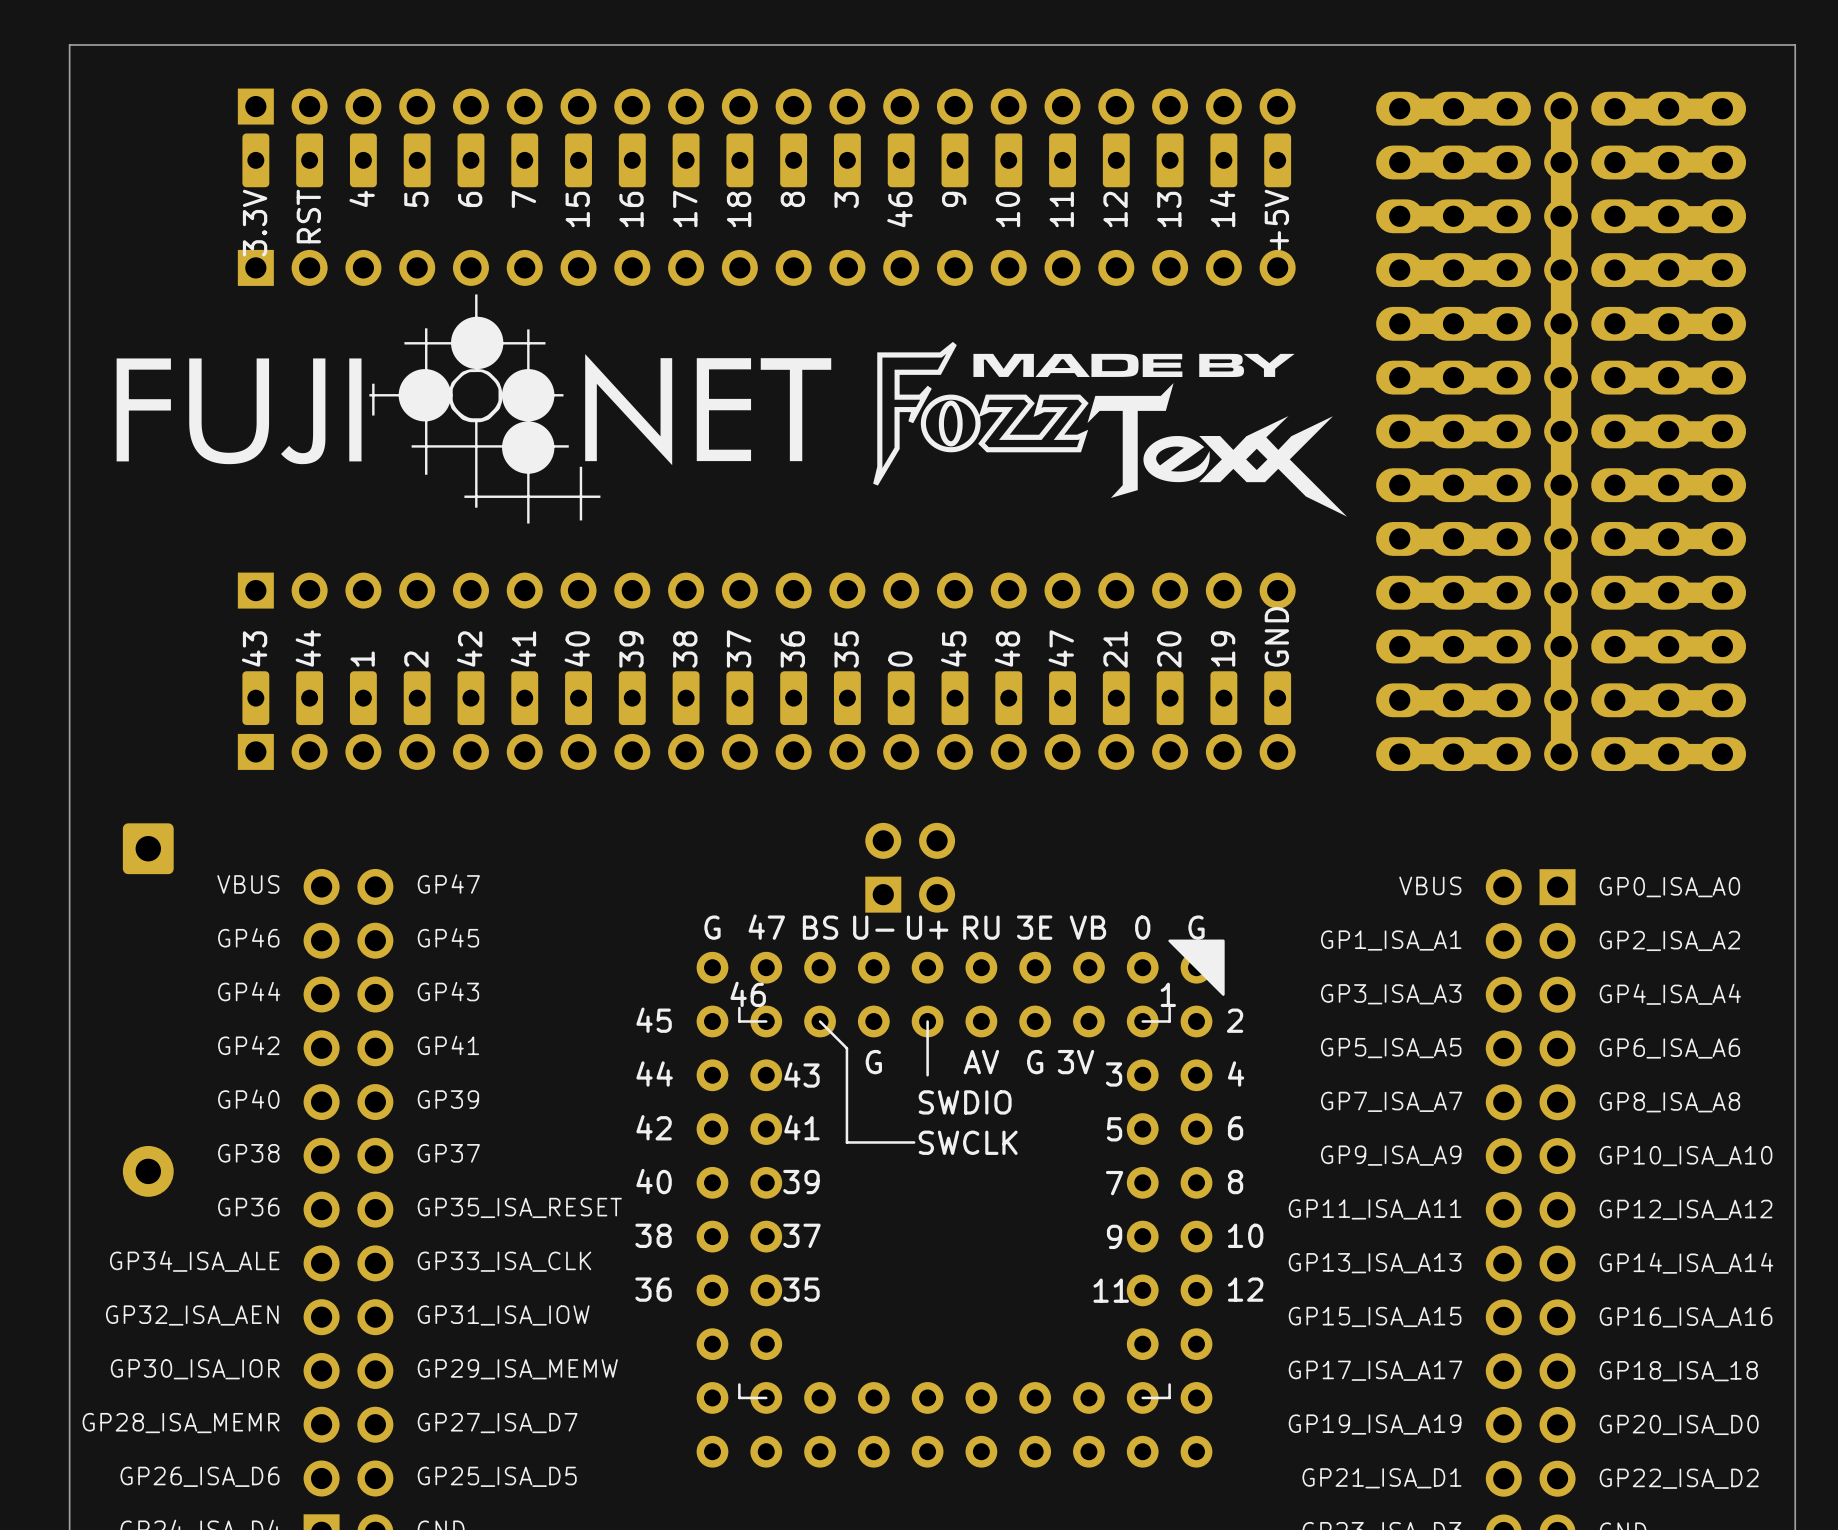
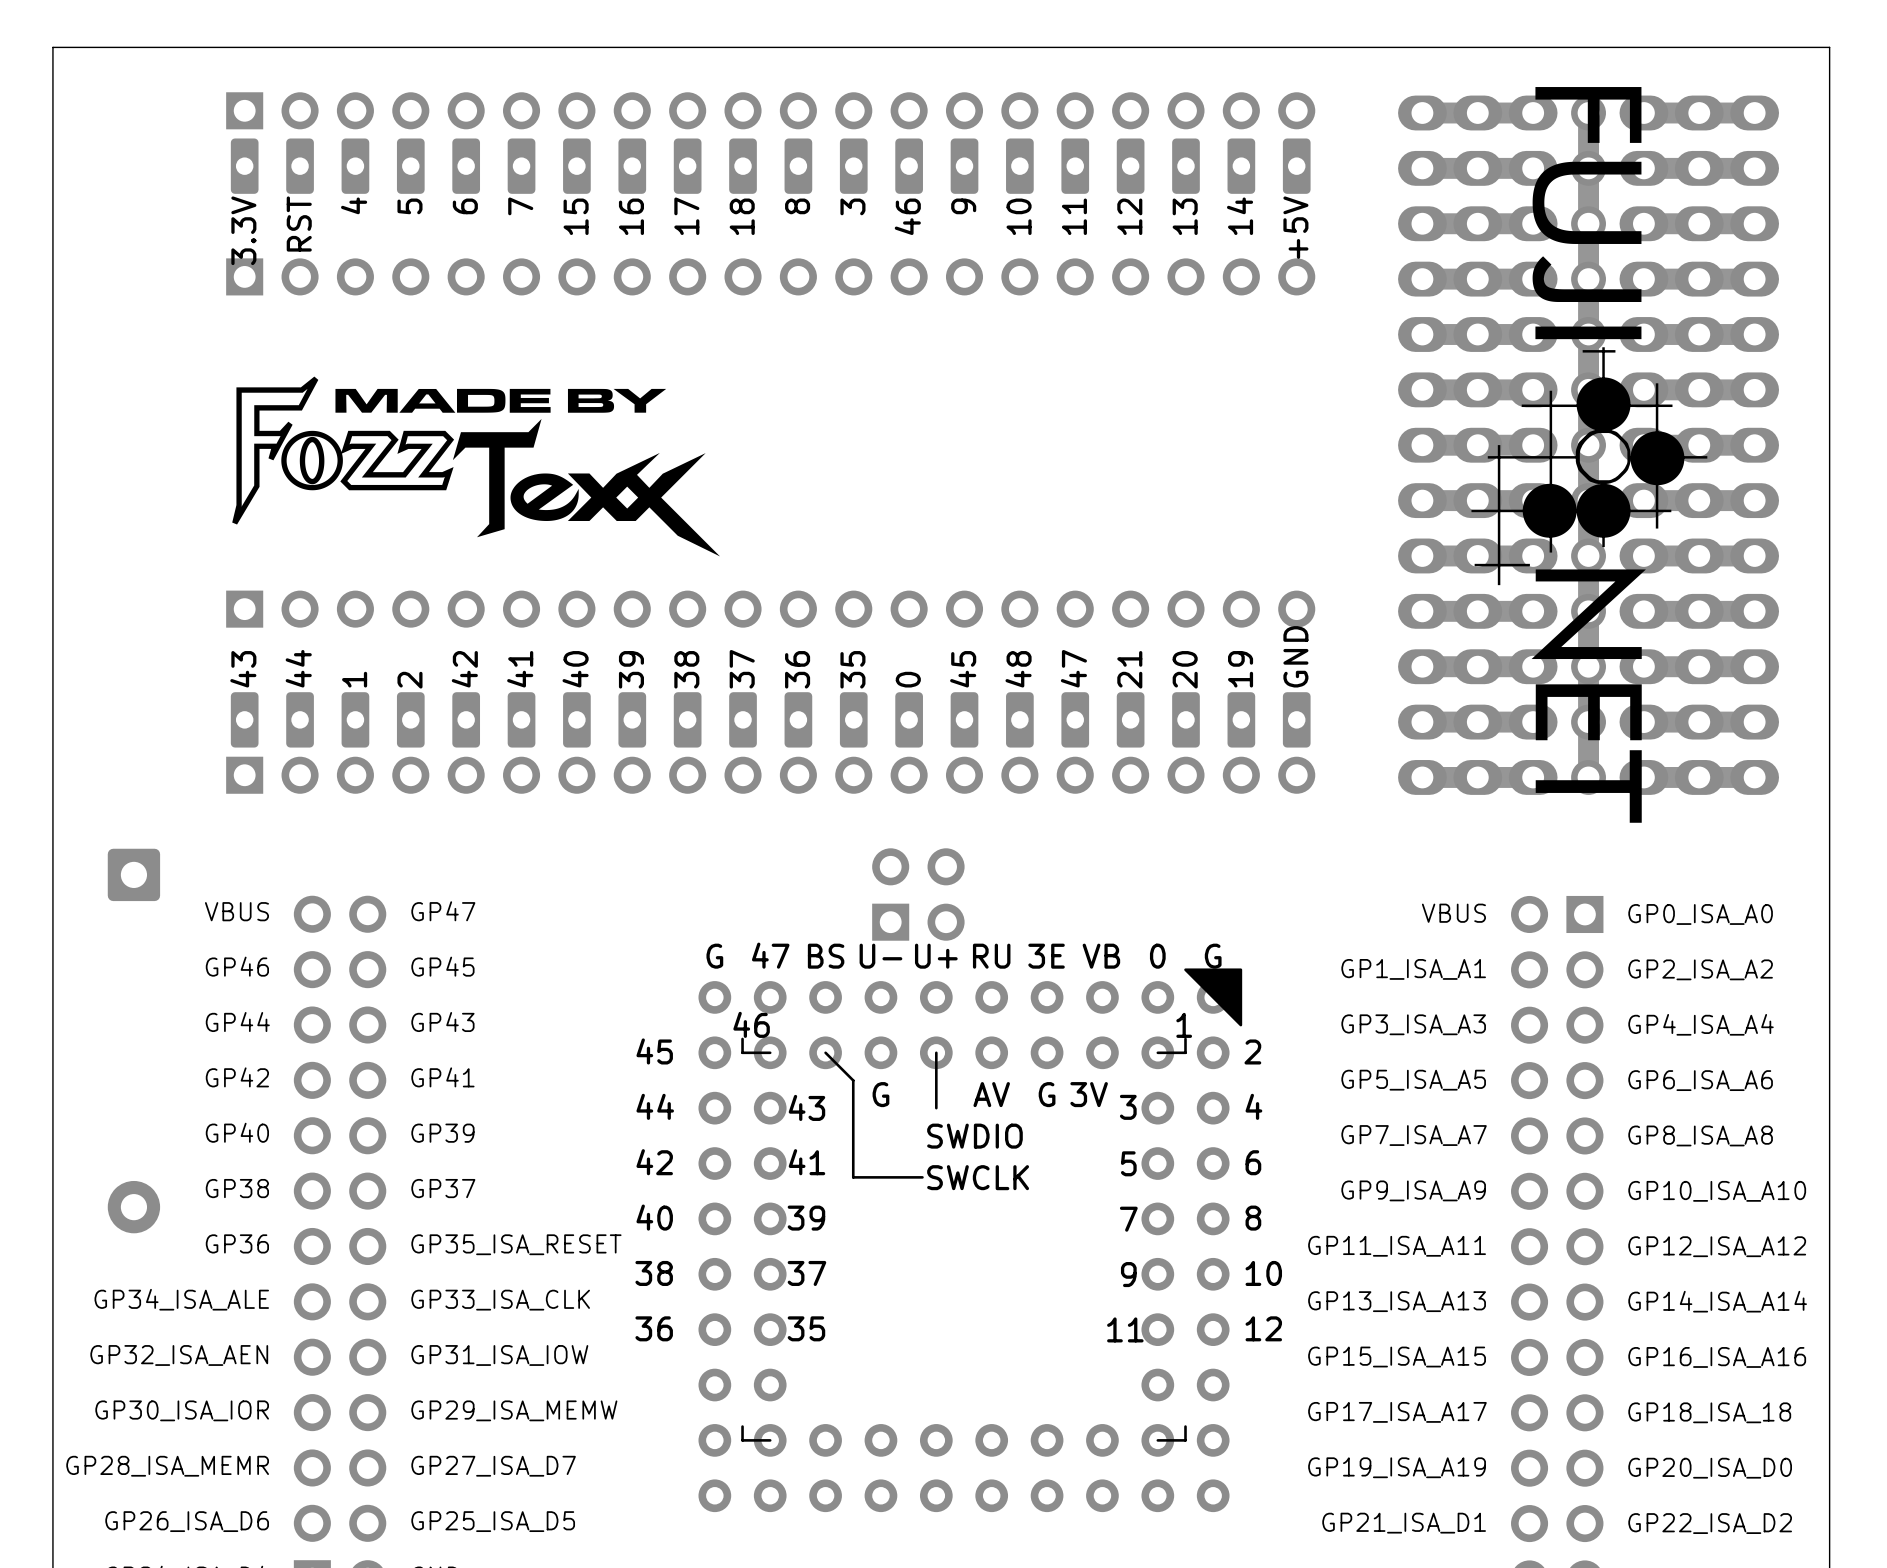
drawing: none -> [1471, 87, 1708, 823]
drawing: [116, 294, 832, 524] -> none
drawing: [873, 341, 1347, 517] -> none
drawing: none -> [232, 376, 721, 557]
drawing shape: [449, 369, 503, 423] -> [456, 388, 506, 413]
drawing shape: [372, 383, 375, 416] -> [335, 388, 398, 413]

